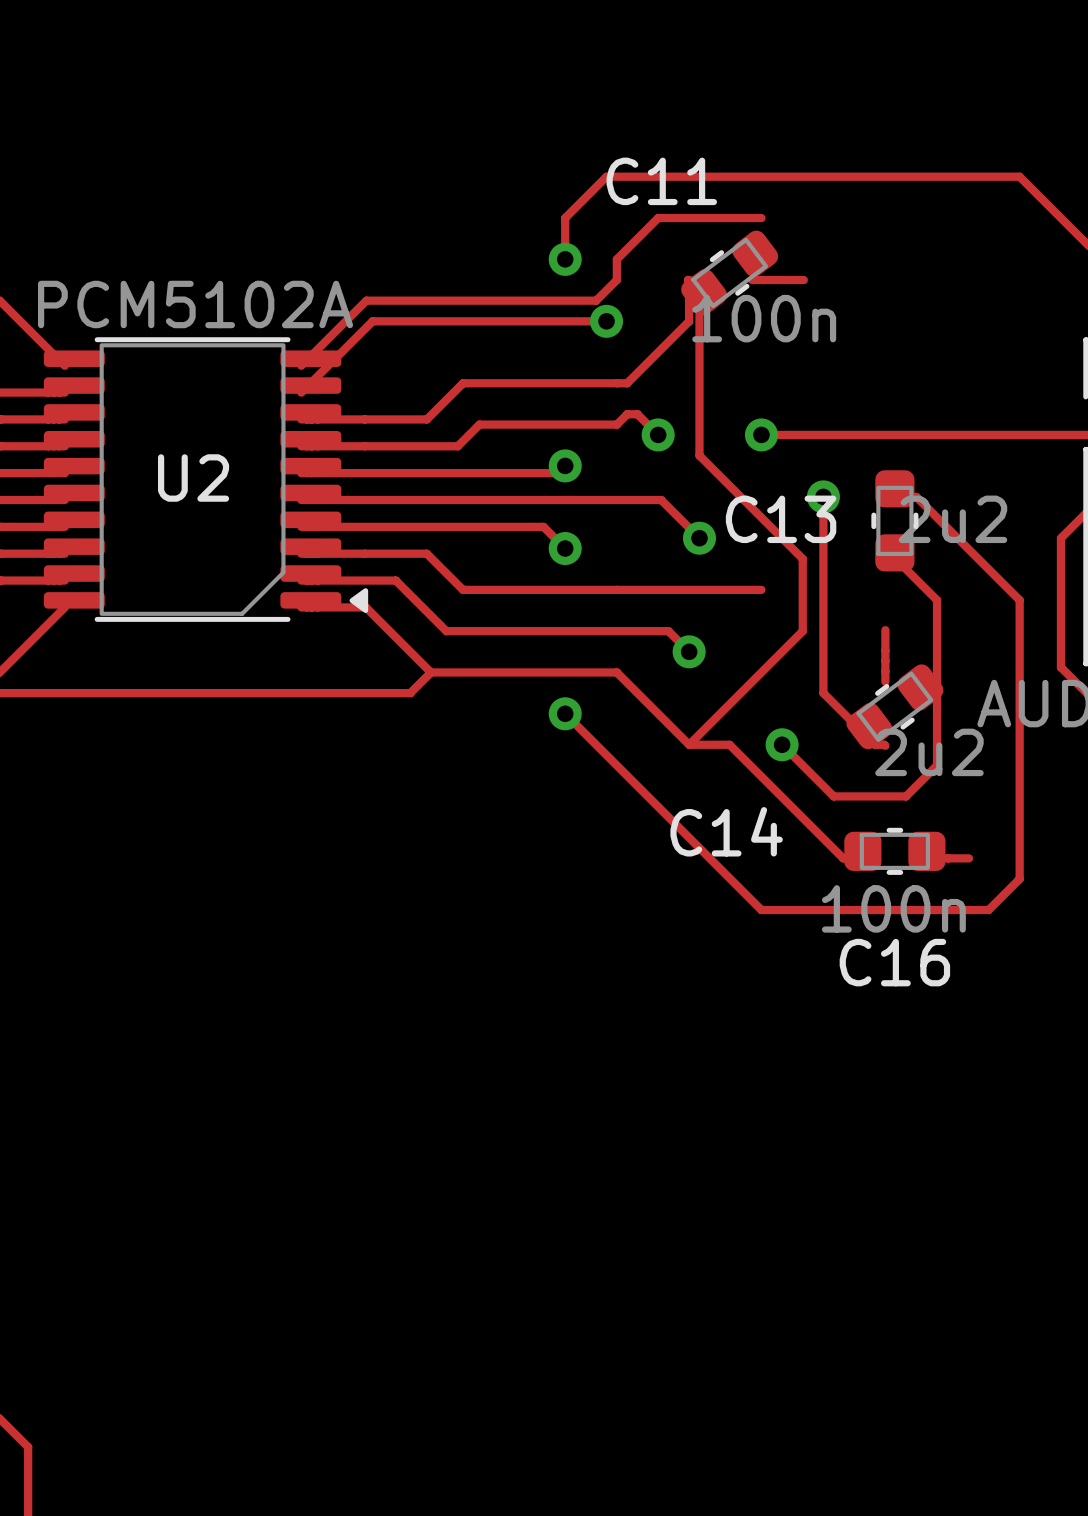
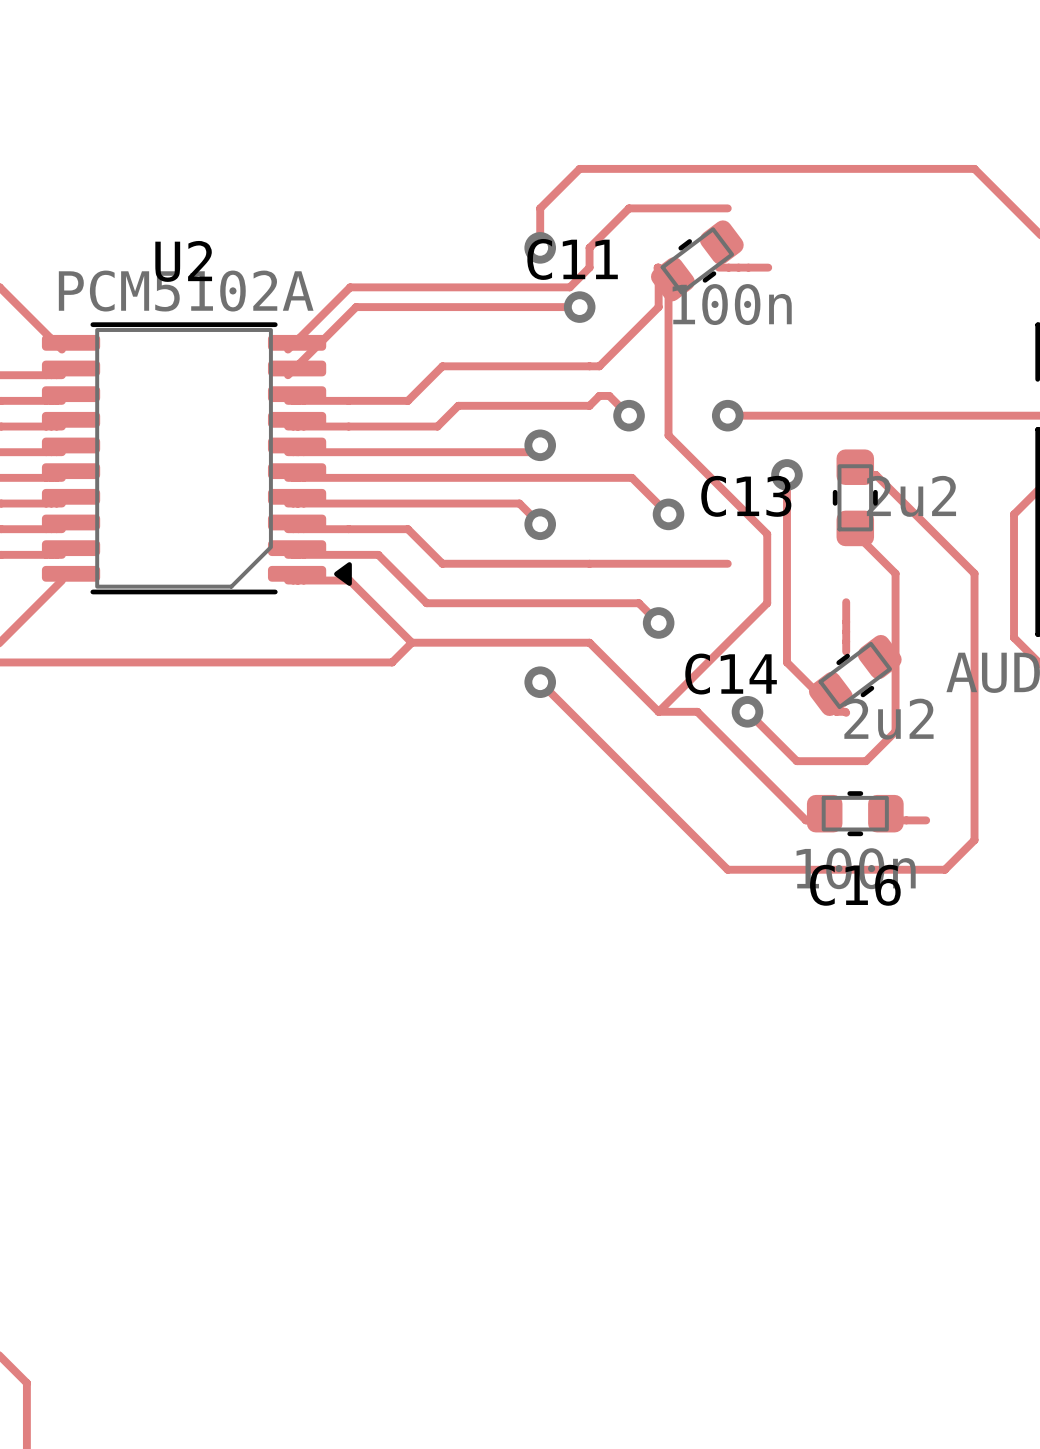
C11 name position: C11 (661, 181) -> C11 (572, 259)
U2 name position: U2 (193, 478) -> U2 (183, 261)
C14 name position: C14 (726, 831) -> C14 (731, 674)
C16 name position: C16 (894, 962) -> C16 (855, 885)

